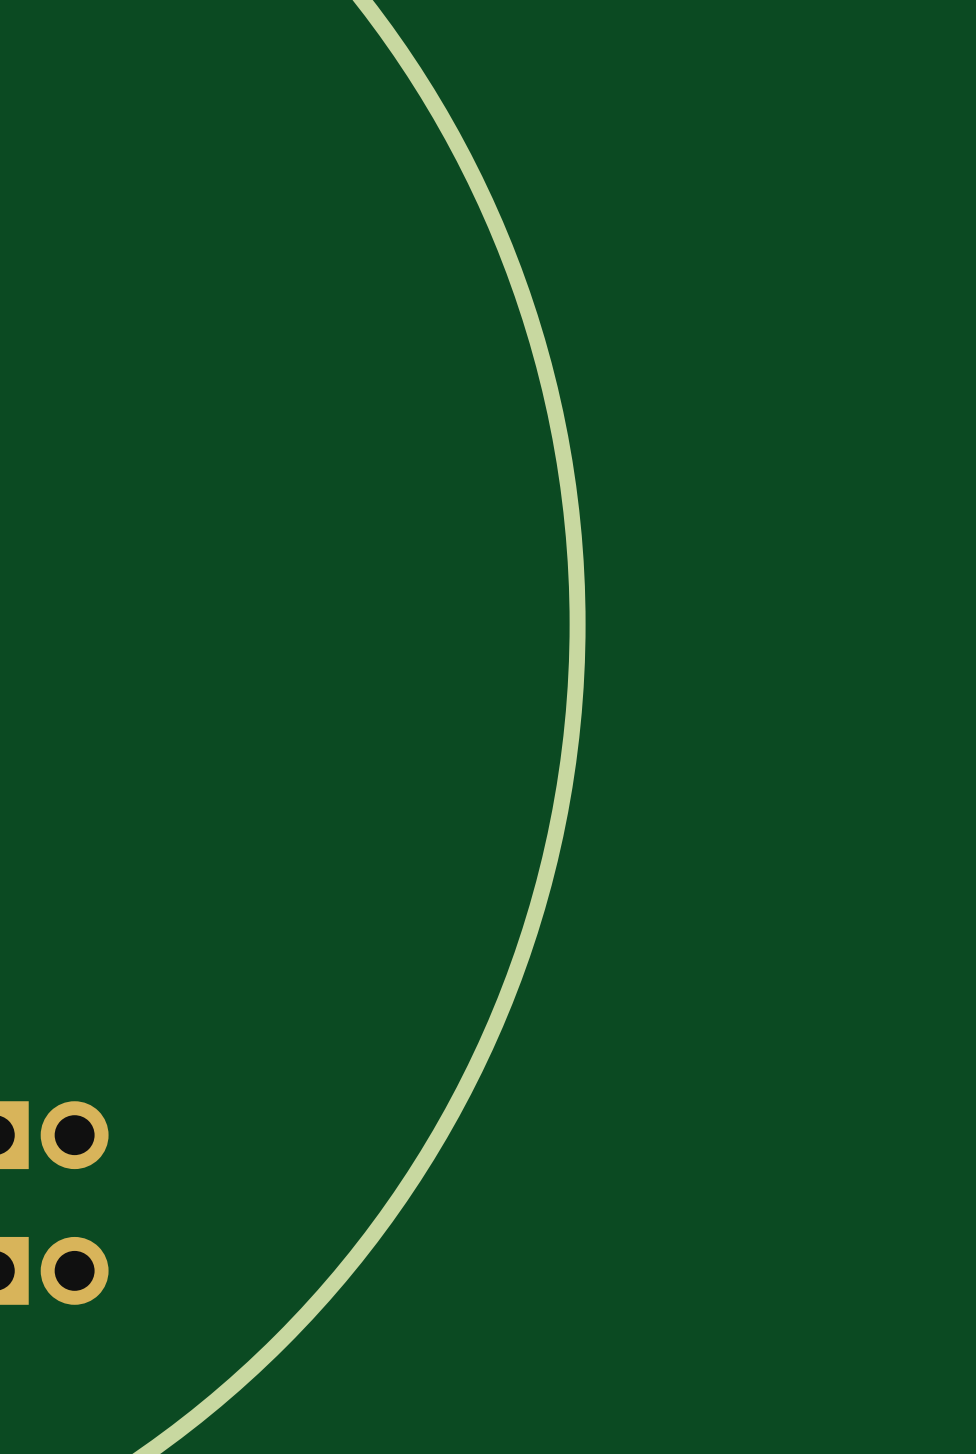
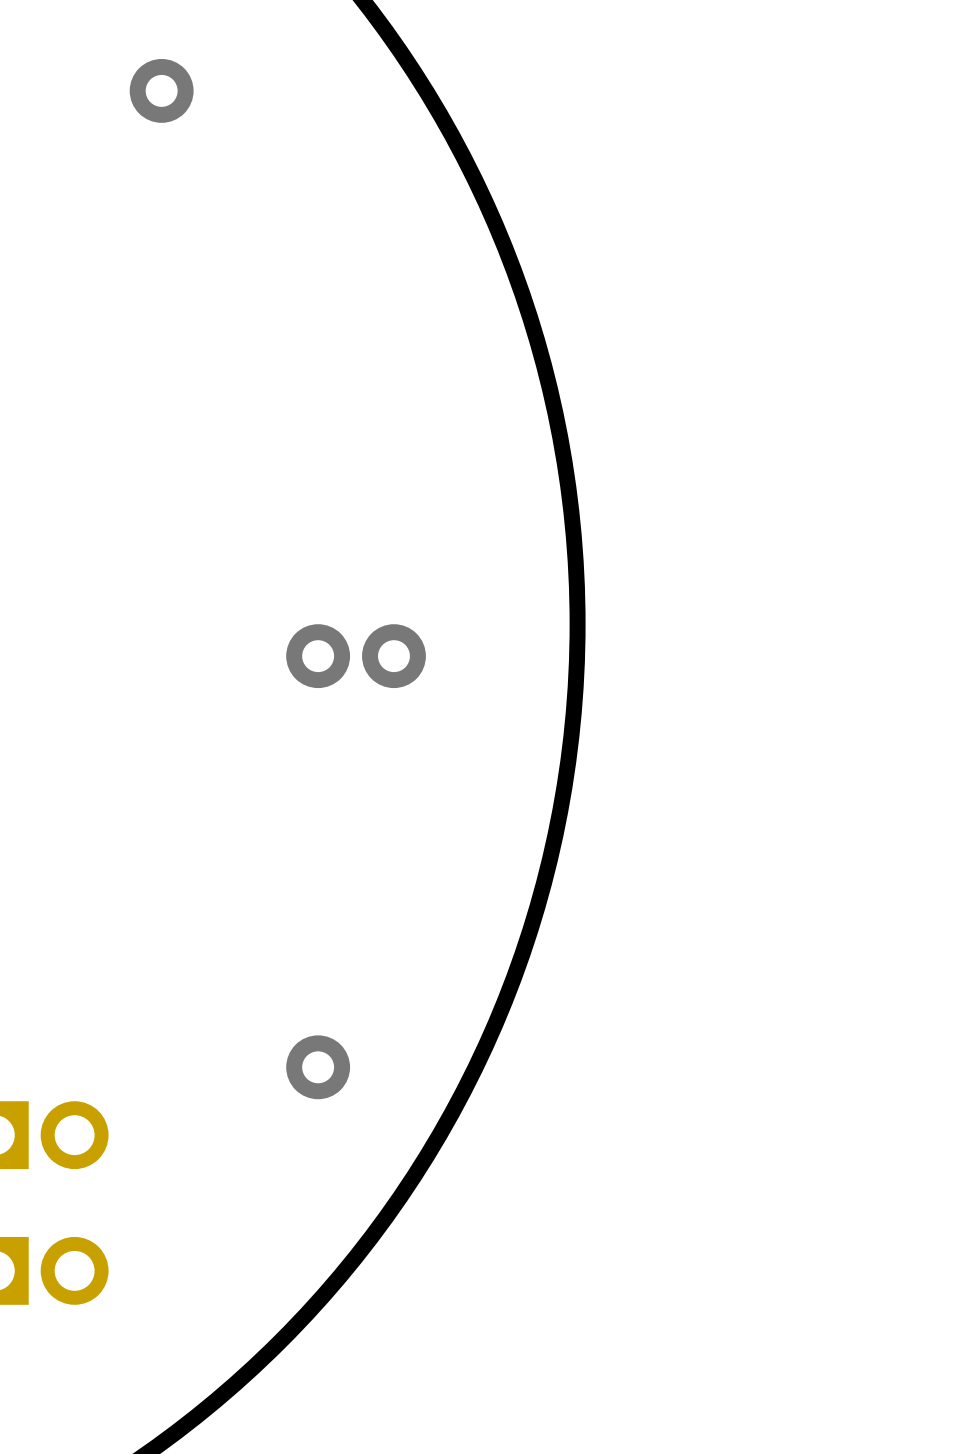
via: none -> (161, 90)
via: none -> (318, 656)
via: none -> (393, 656)
via: none -> (318, 1067)

